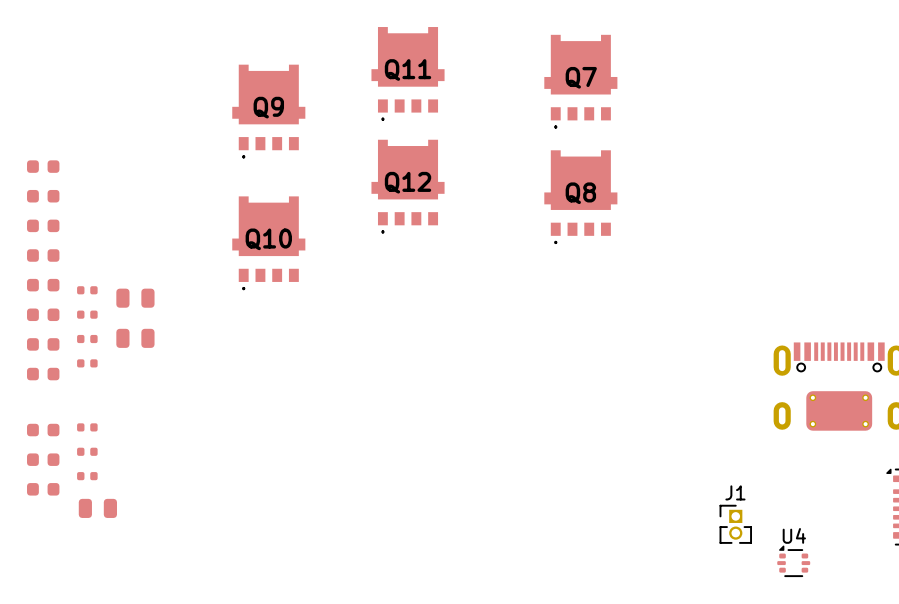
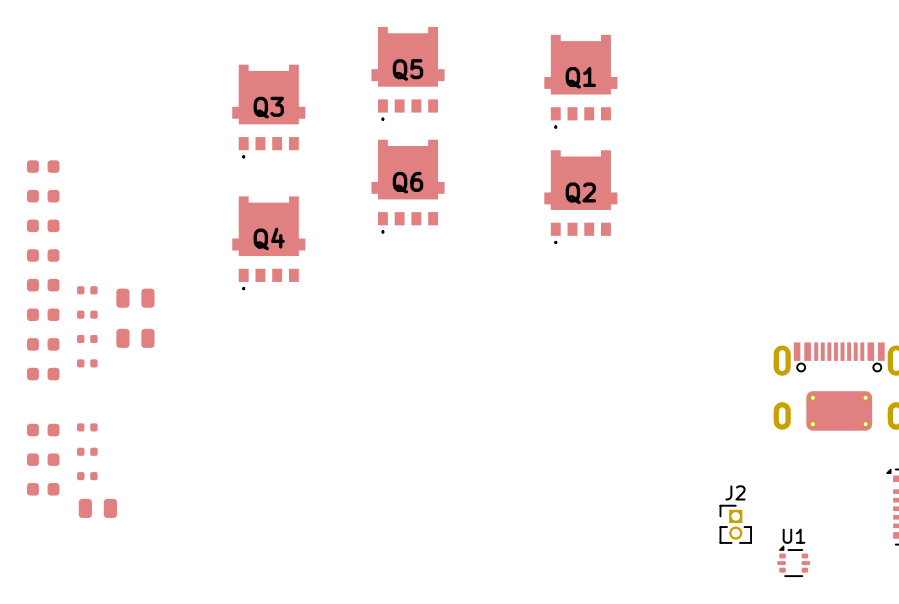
Q11 name: Q11 (408, 69) -> Q5 (408, 69)
Q7 name: Q7 (581, 77) -> Q1 (580, 77)
Q9 name: Q9 (268, 107) -> Q3 (268, 107)
Q12 name: Q12 (408, 182) -> Q6 (408, 182)
Q8 name: Q8 (580, 193) -> Q2 (580, 193)
Q10 name: Q10 (268, 239) -> Q4 (269, 238)
J1 name: J1 (735, 492) -> J2 (735, 492)
U4 name: U4 (794, 535) -> U1 (794, 536)

